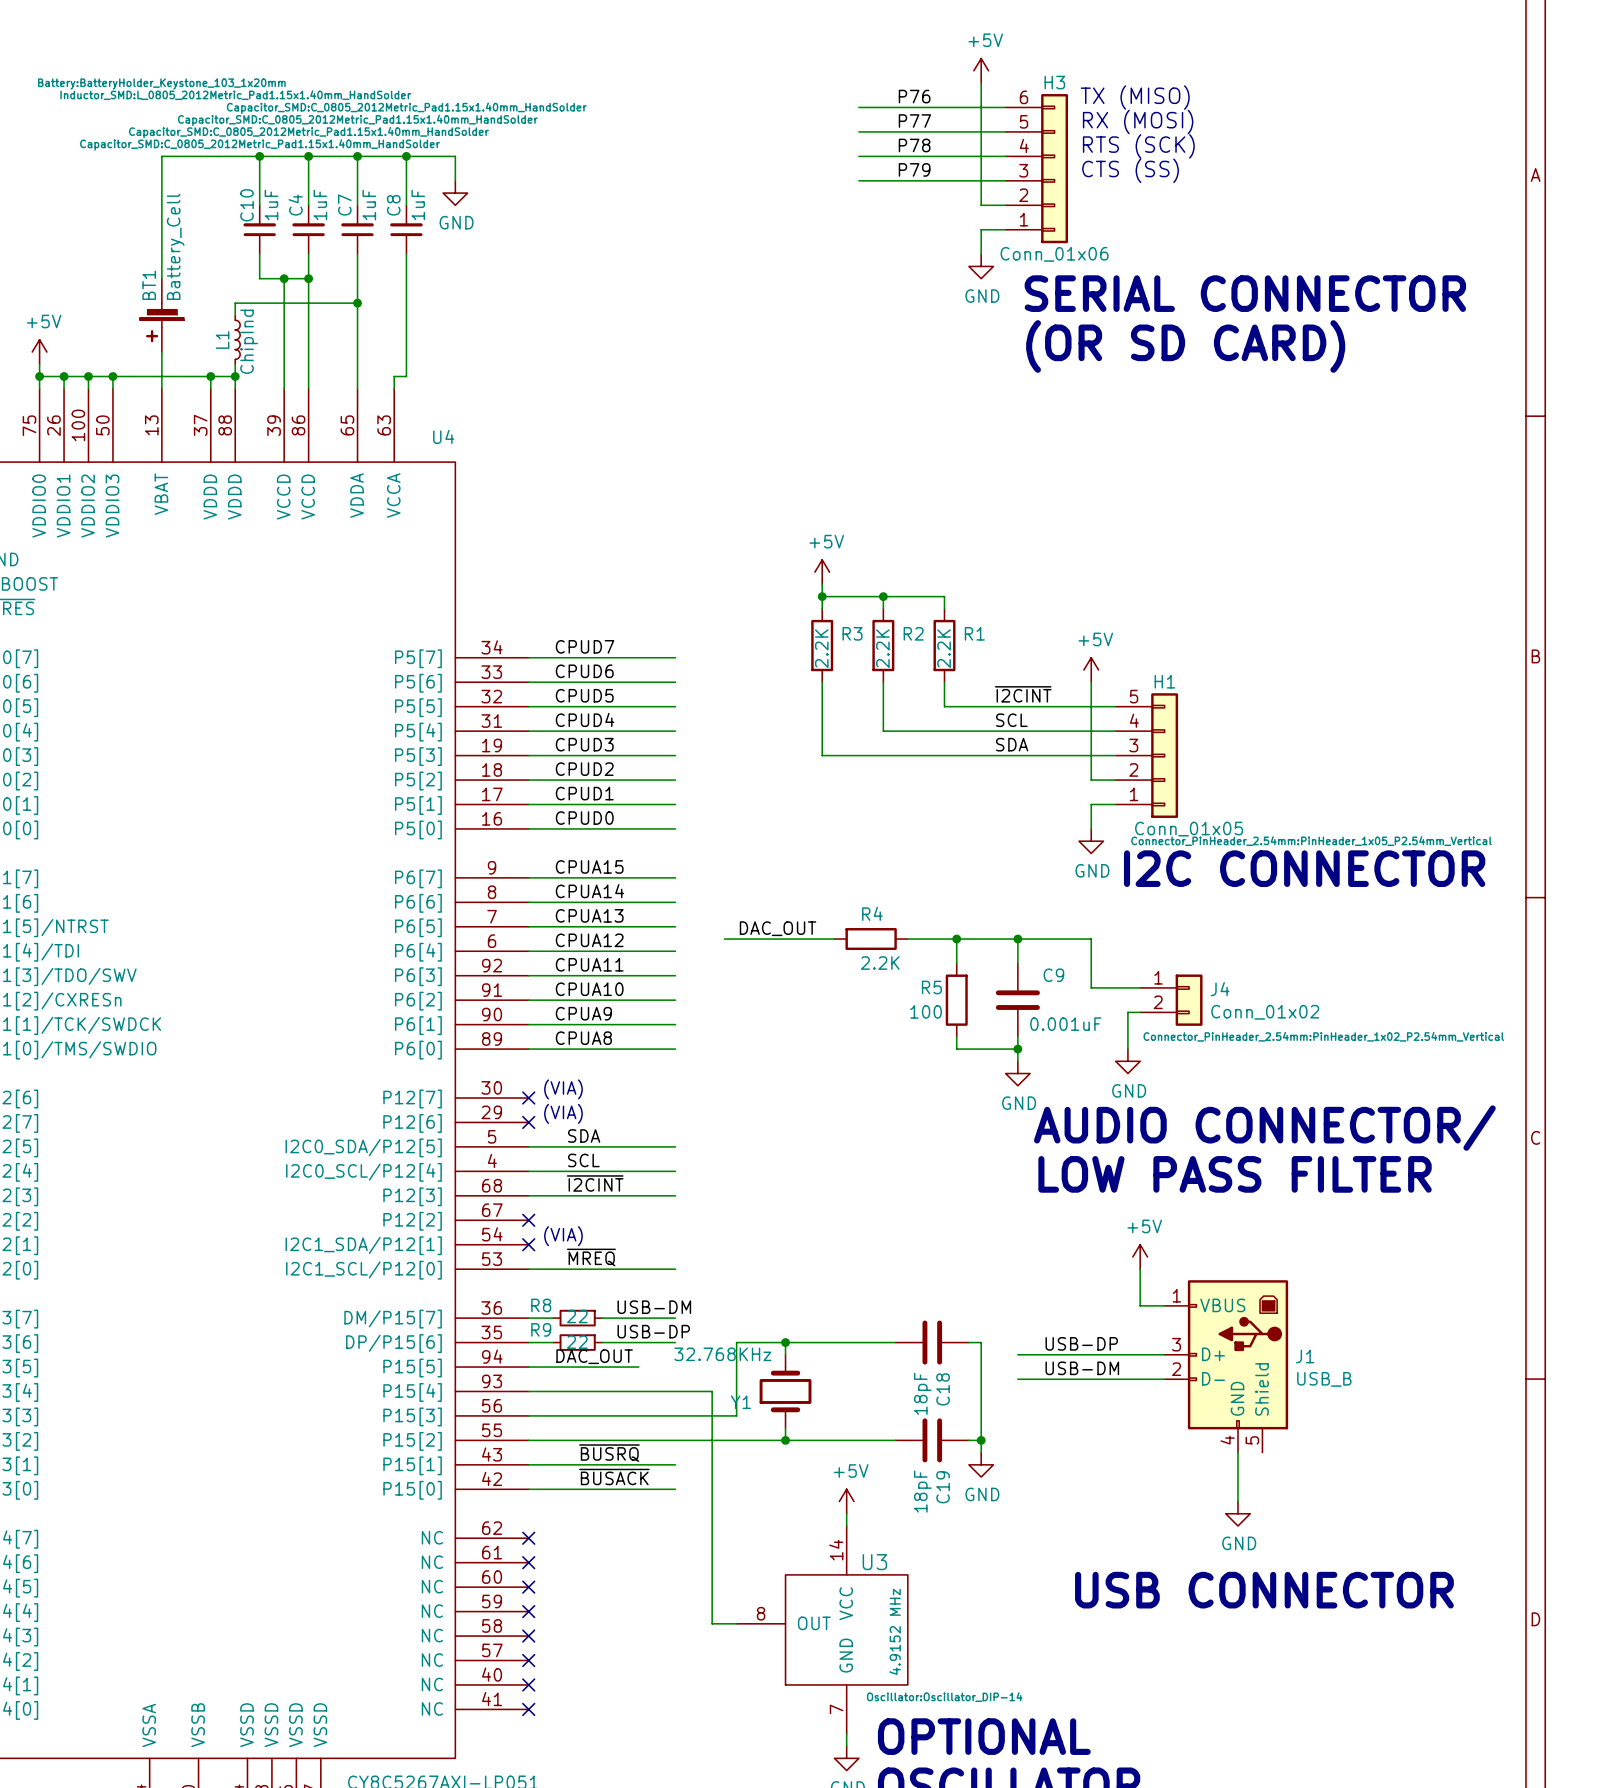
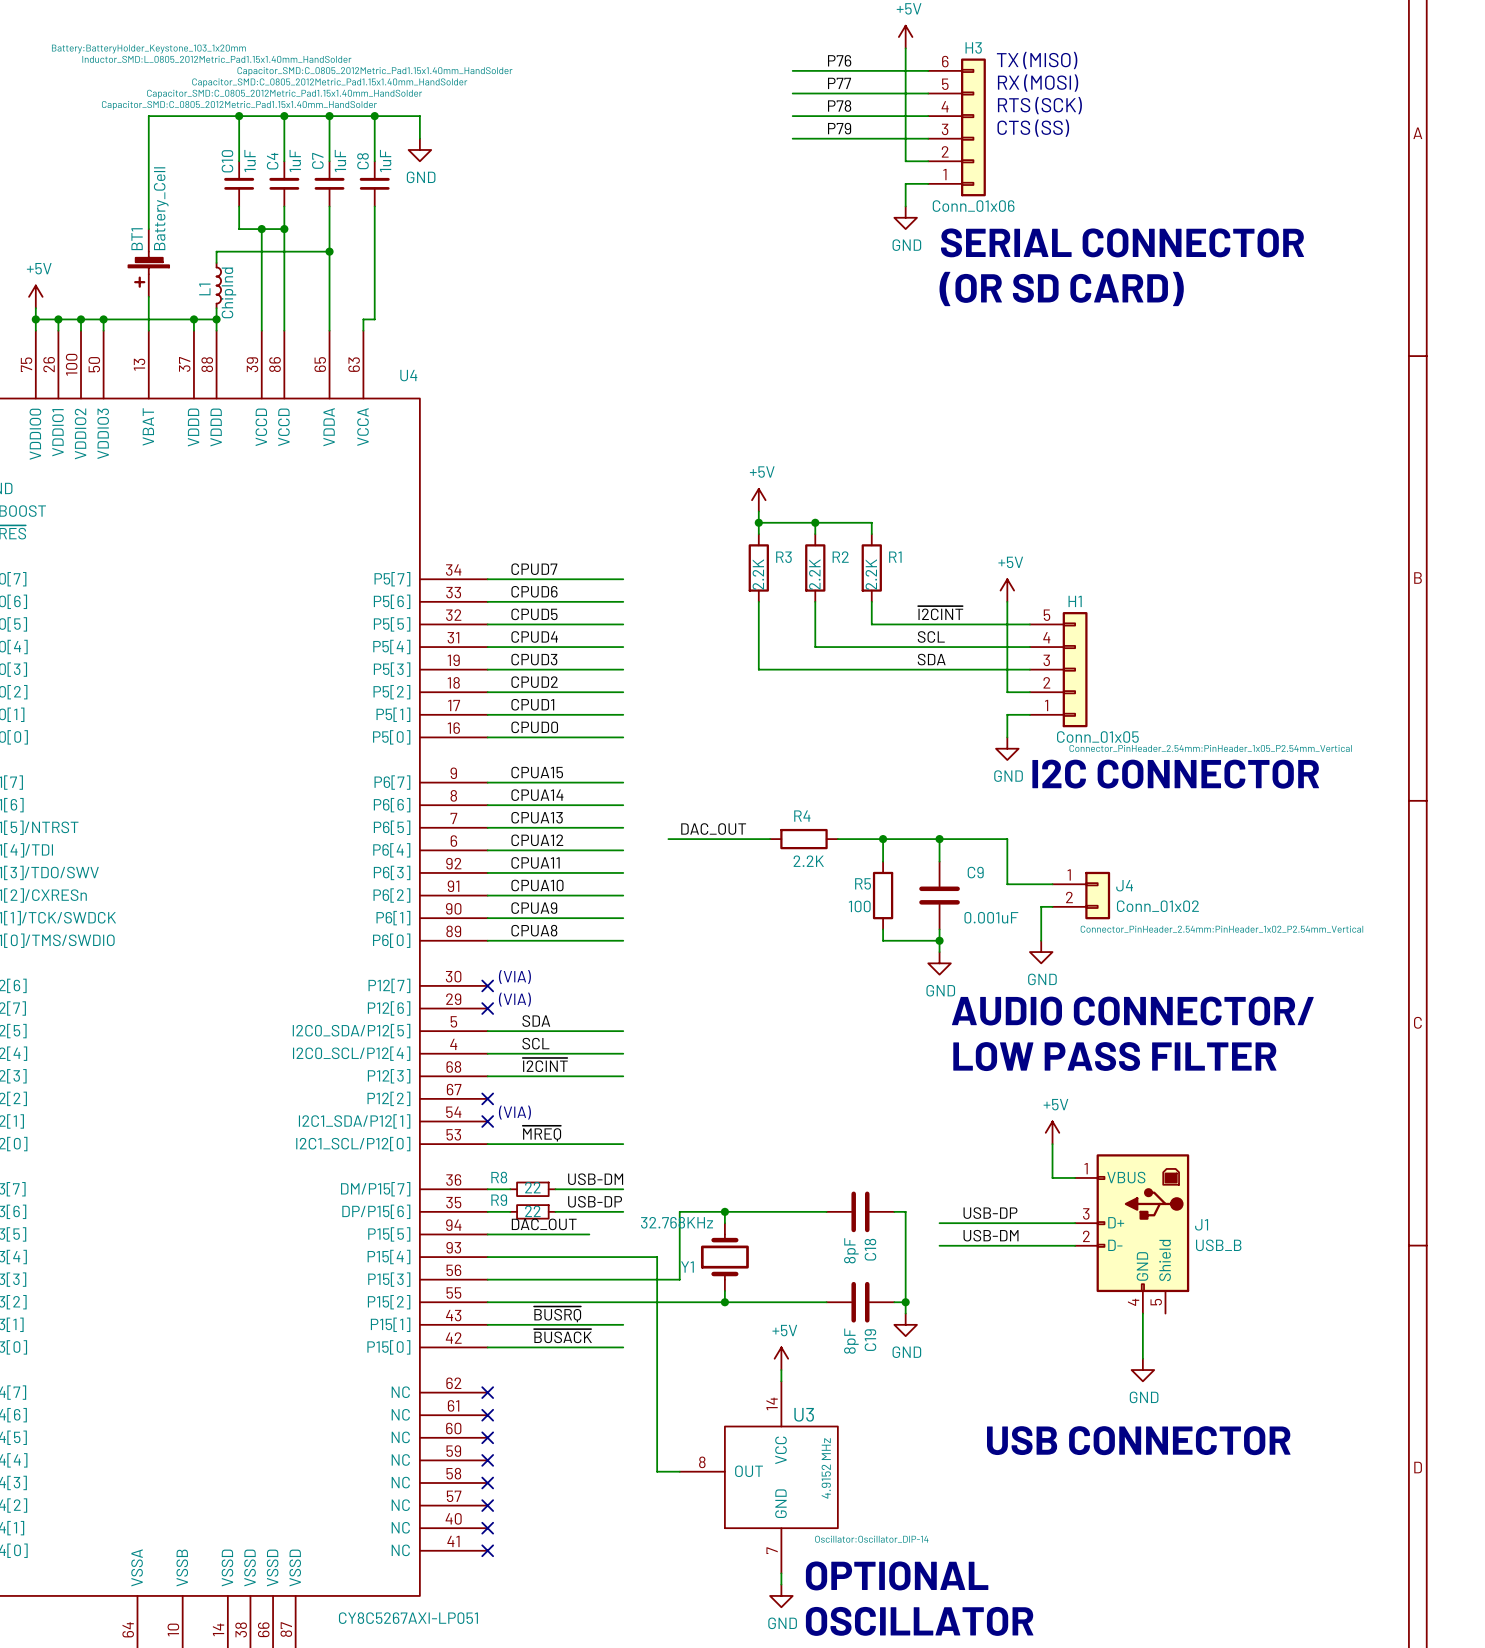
C18 value: 18pF (922, 1393) -> 8pF (851, 1250)
C19 value: 18pF (922, 1491) -> 8pF (851, 1341)

